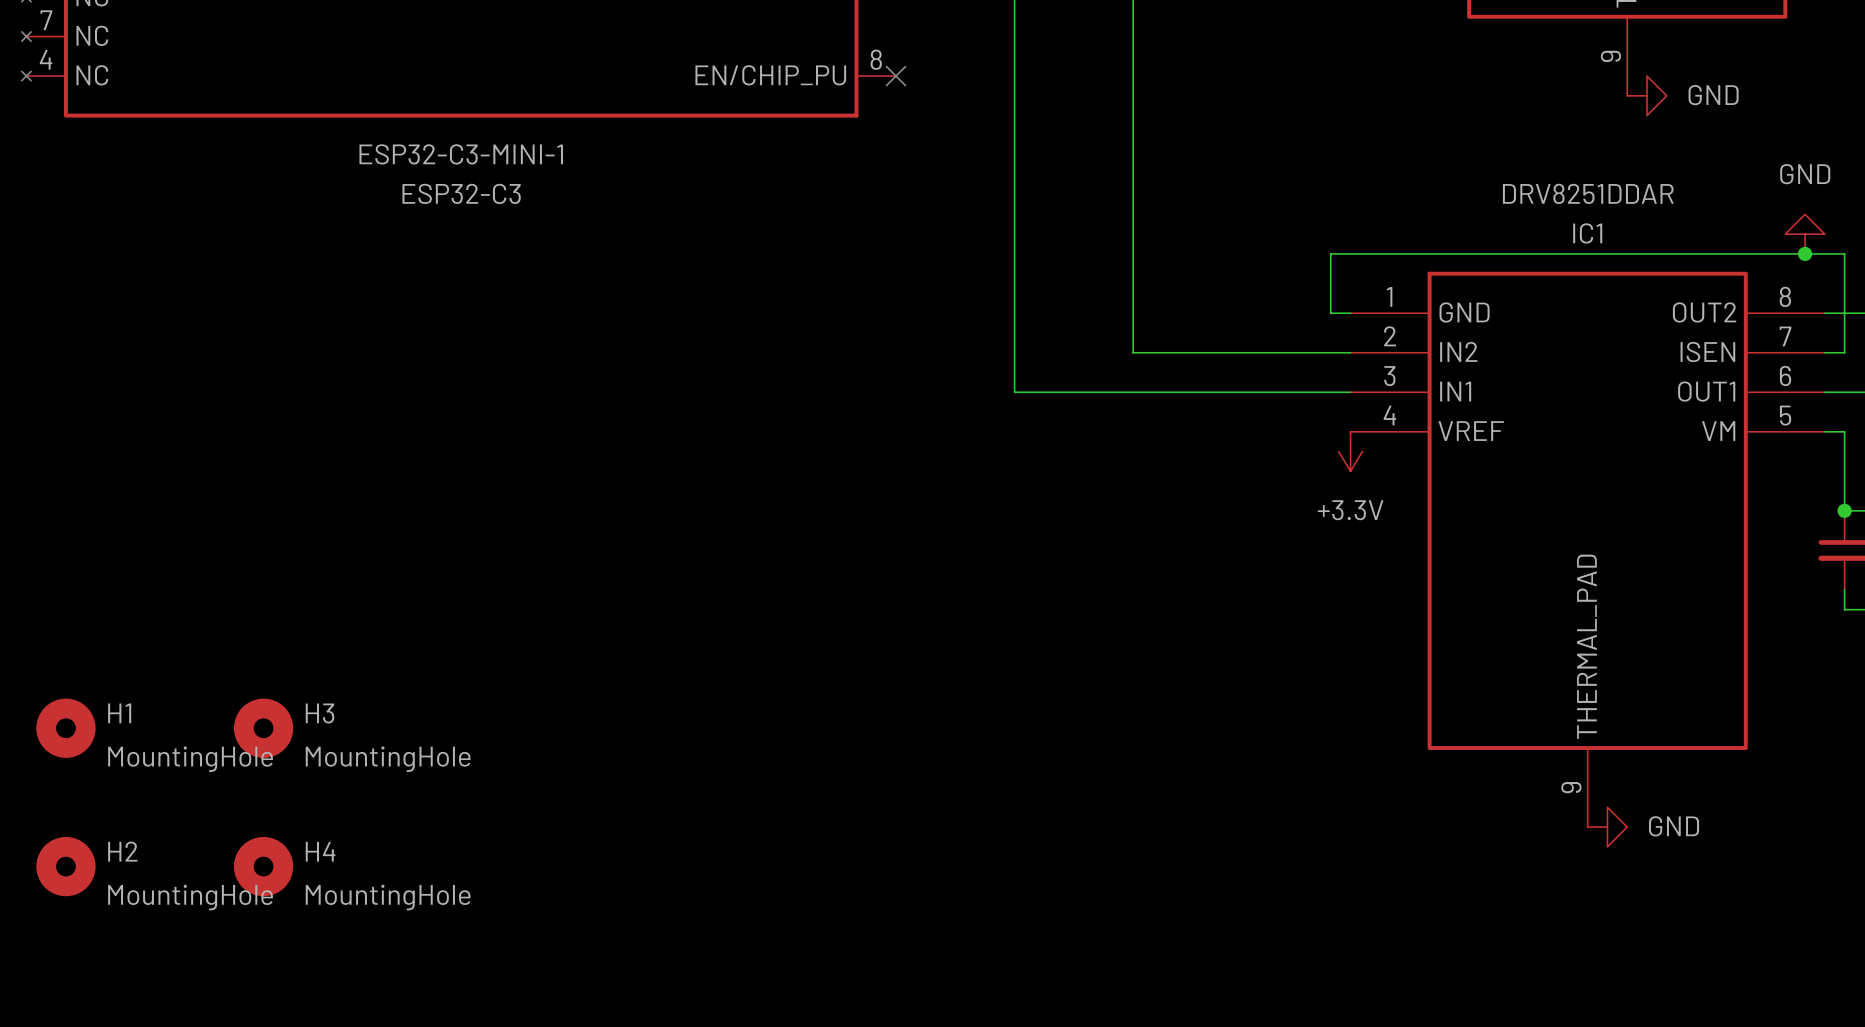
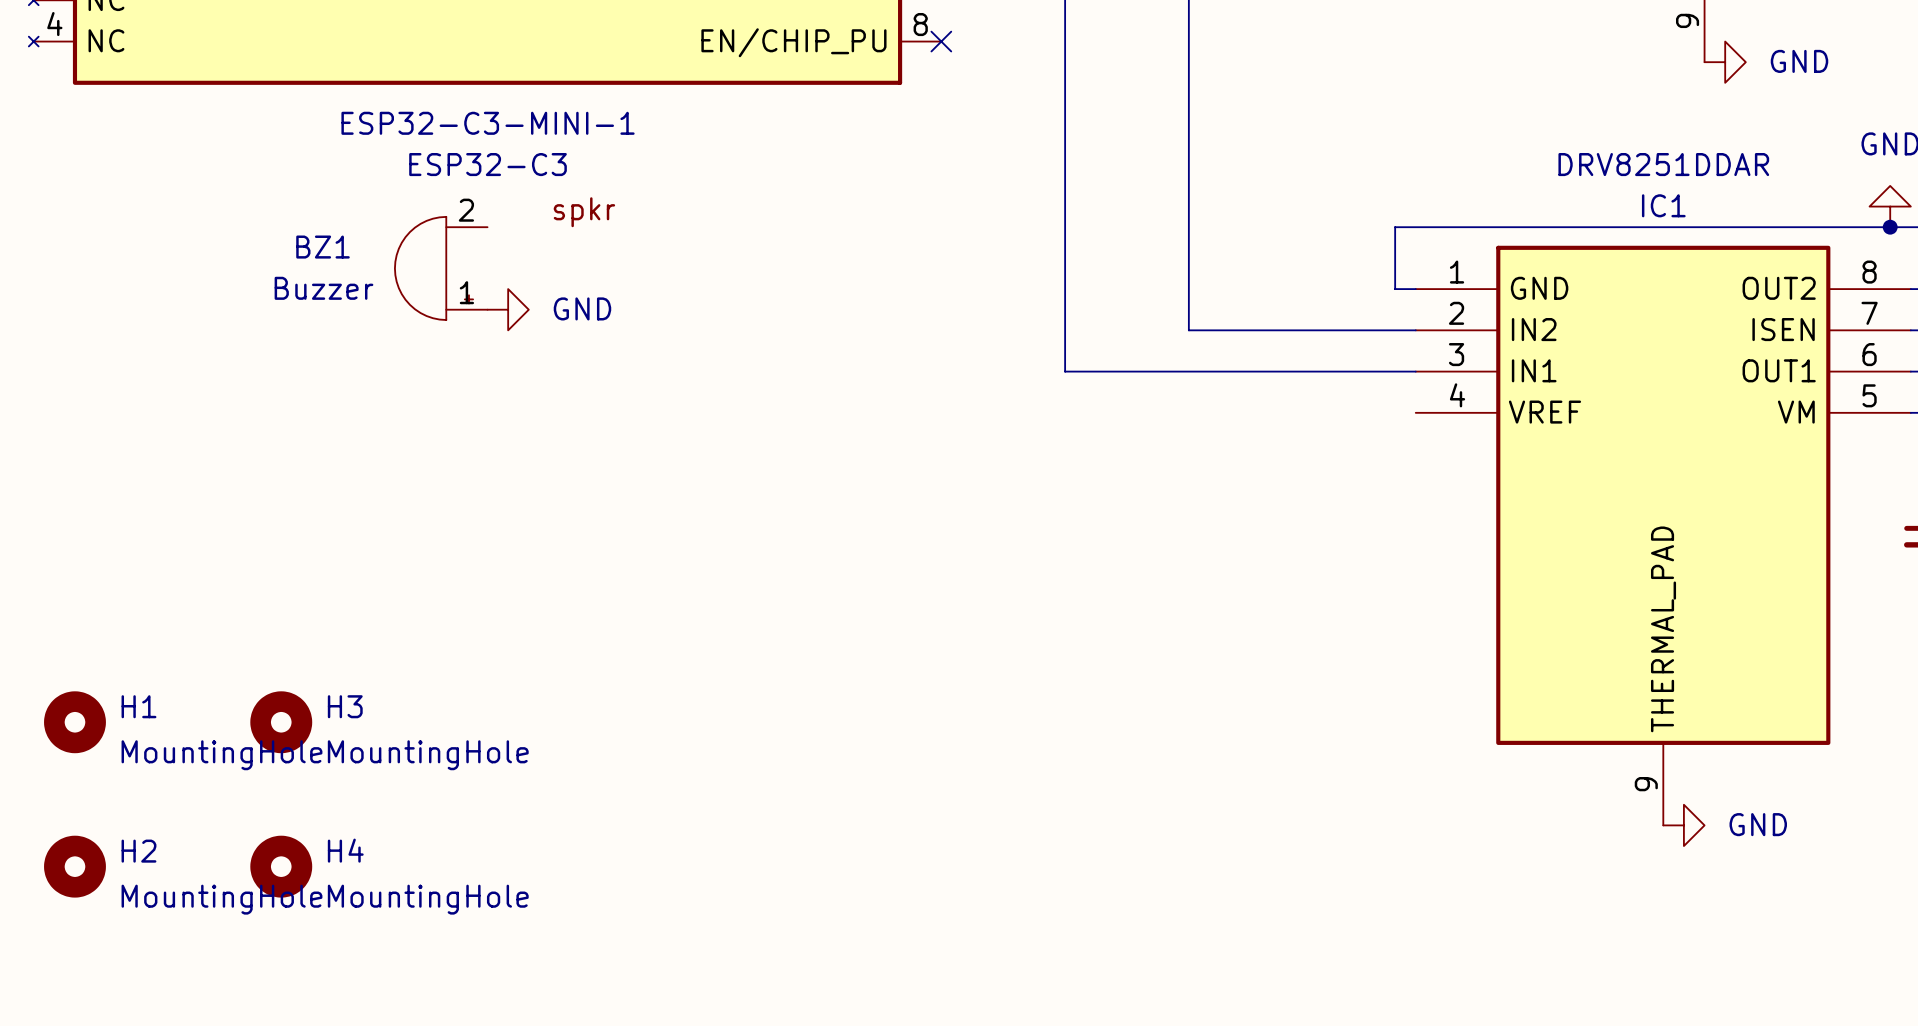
label: none -> spkr (584, 212)
BZ1: none -> Buzzer (441, 268)
power symbol: none -> GND (508, 309)
power symbol: +3.3V (1350, 451) -> none

